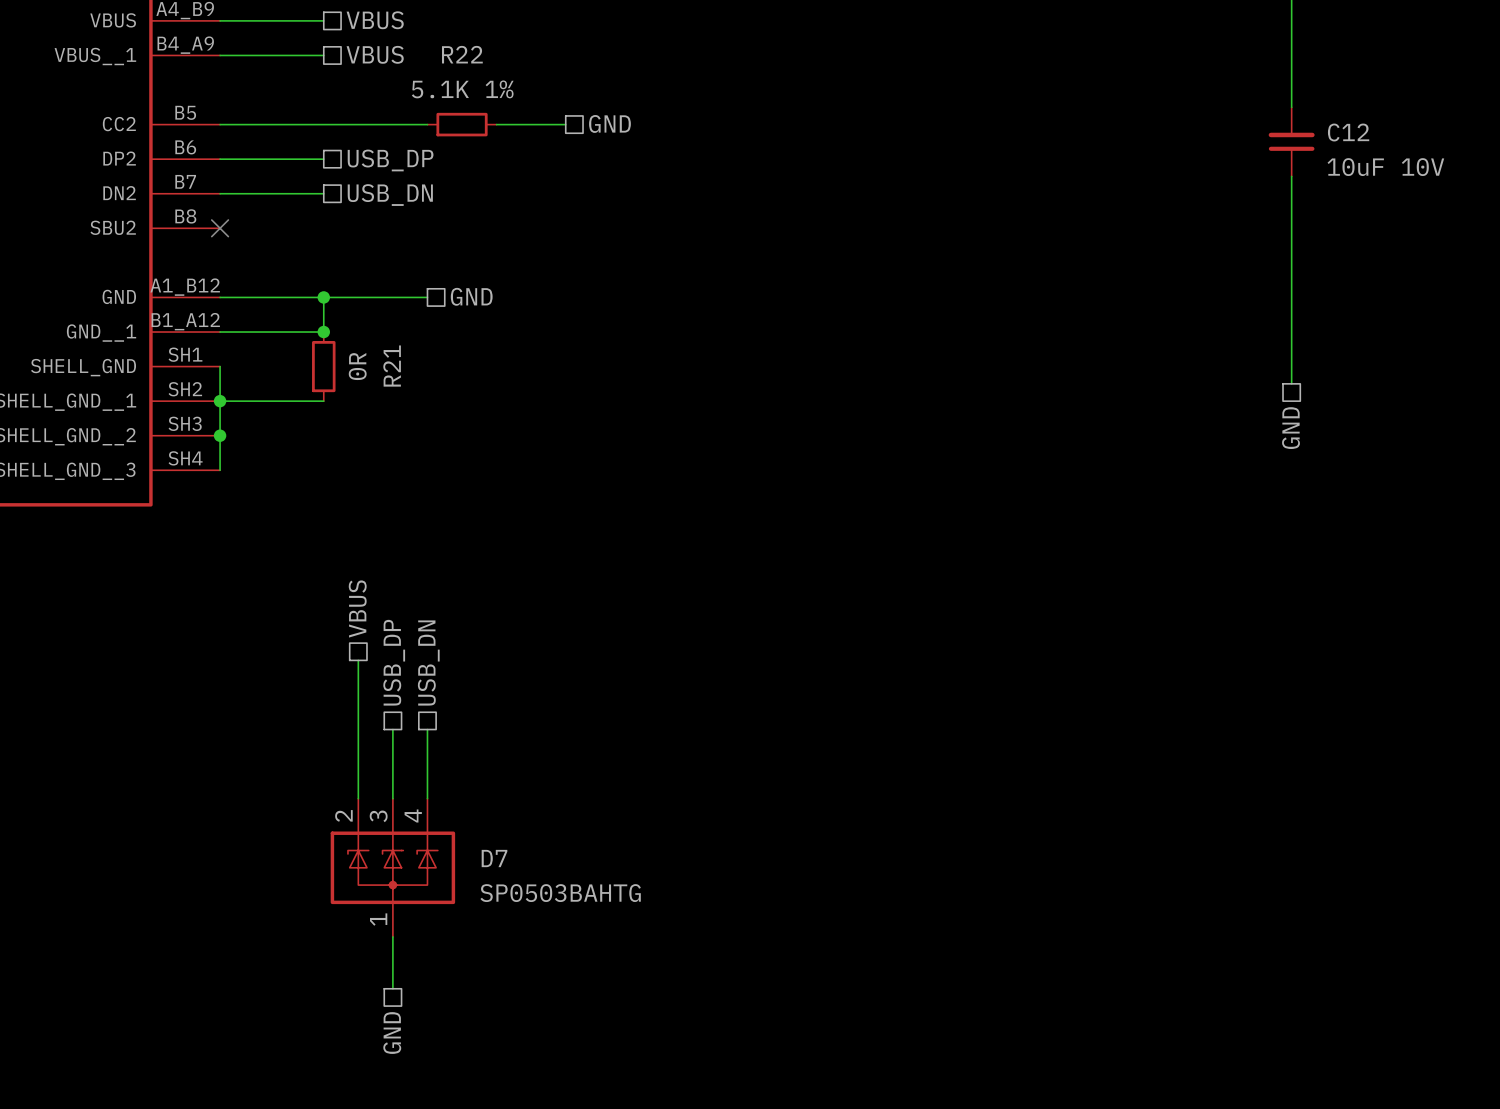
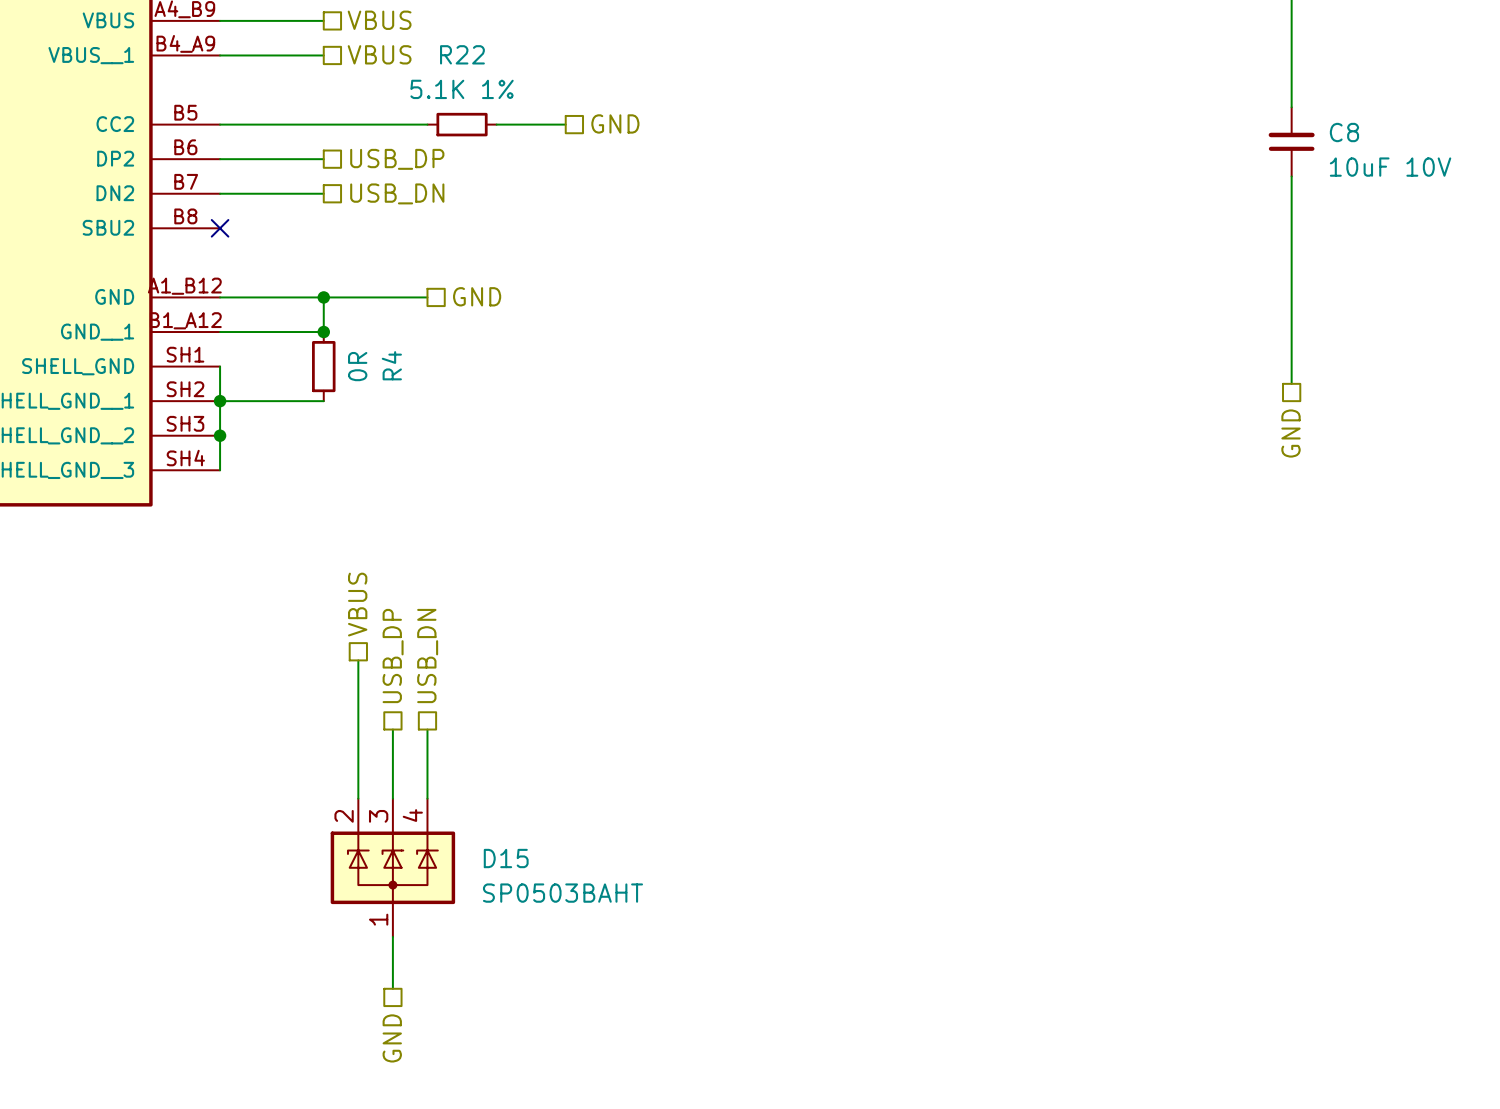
C12 name: C12 (1348, 132) -> C8 (1344, 132)
R21 name: R21 (392, 366) -> R4 (391, 365)
D7 name: D7 (494, 858) -> D15 (506, 858)
D7 value: SP0503BAHTG (560, 893) -> SP0503BAHT (562, 893)

